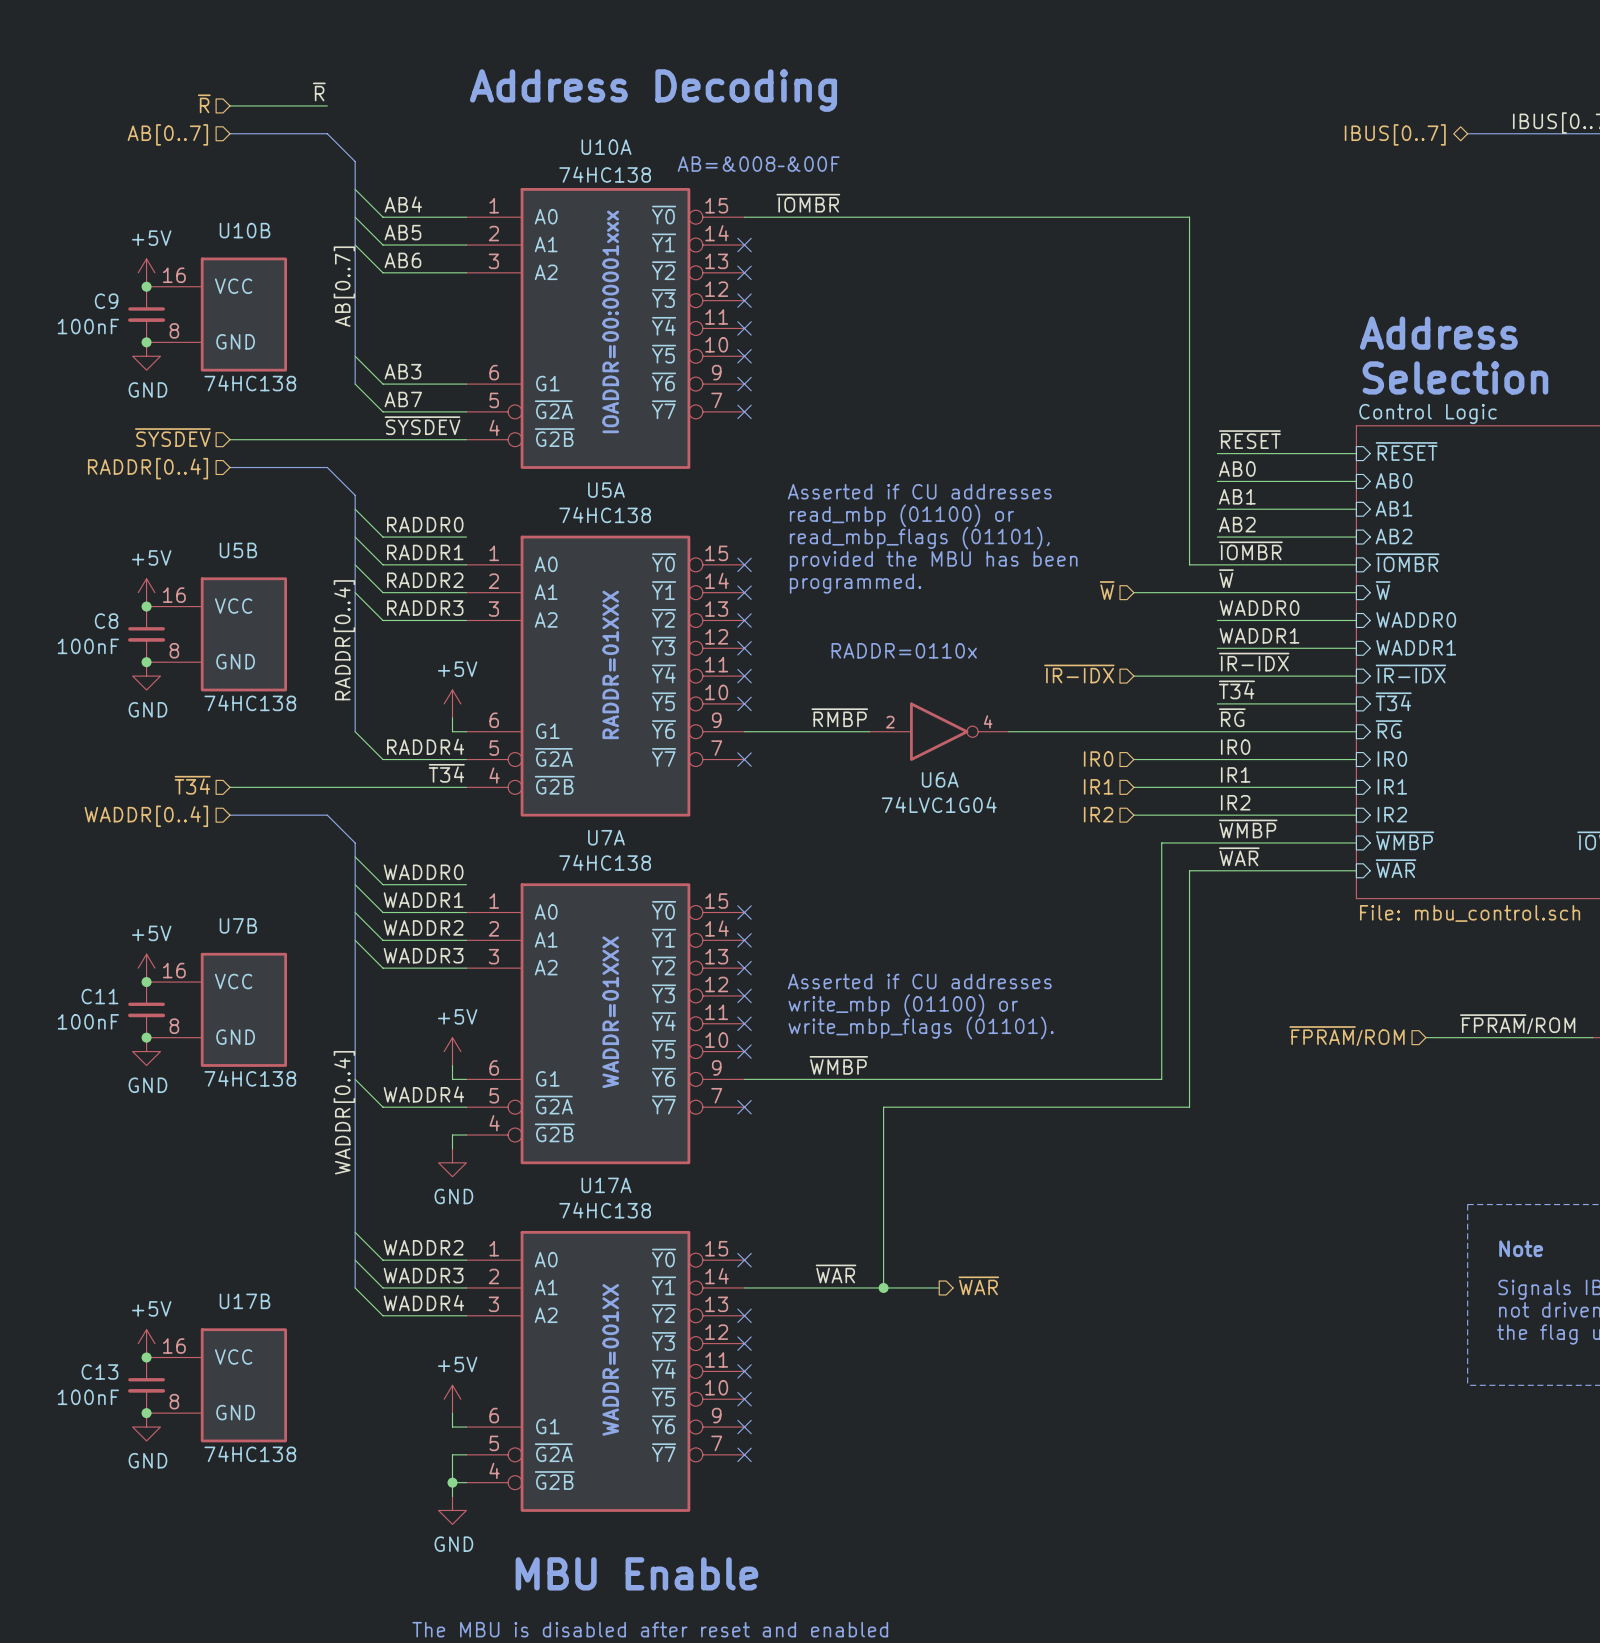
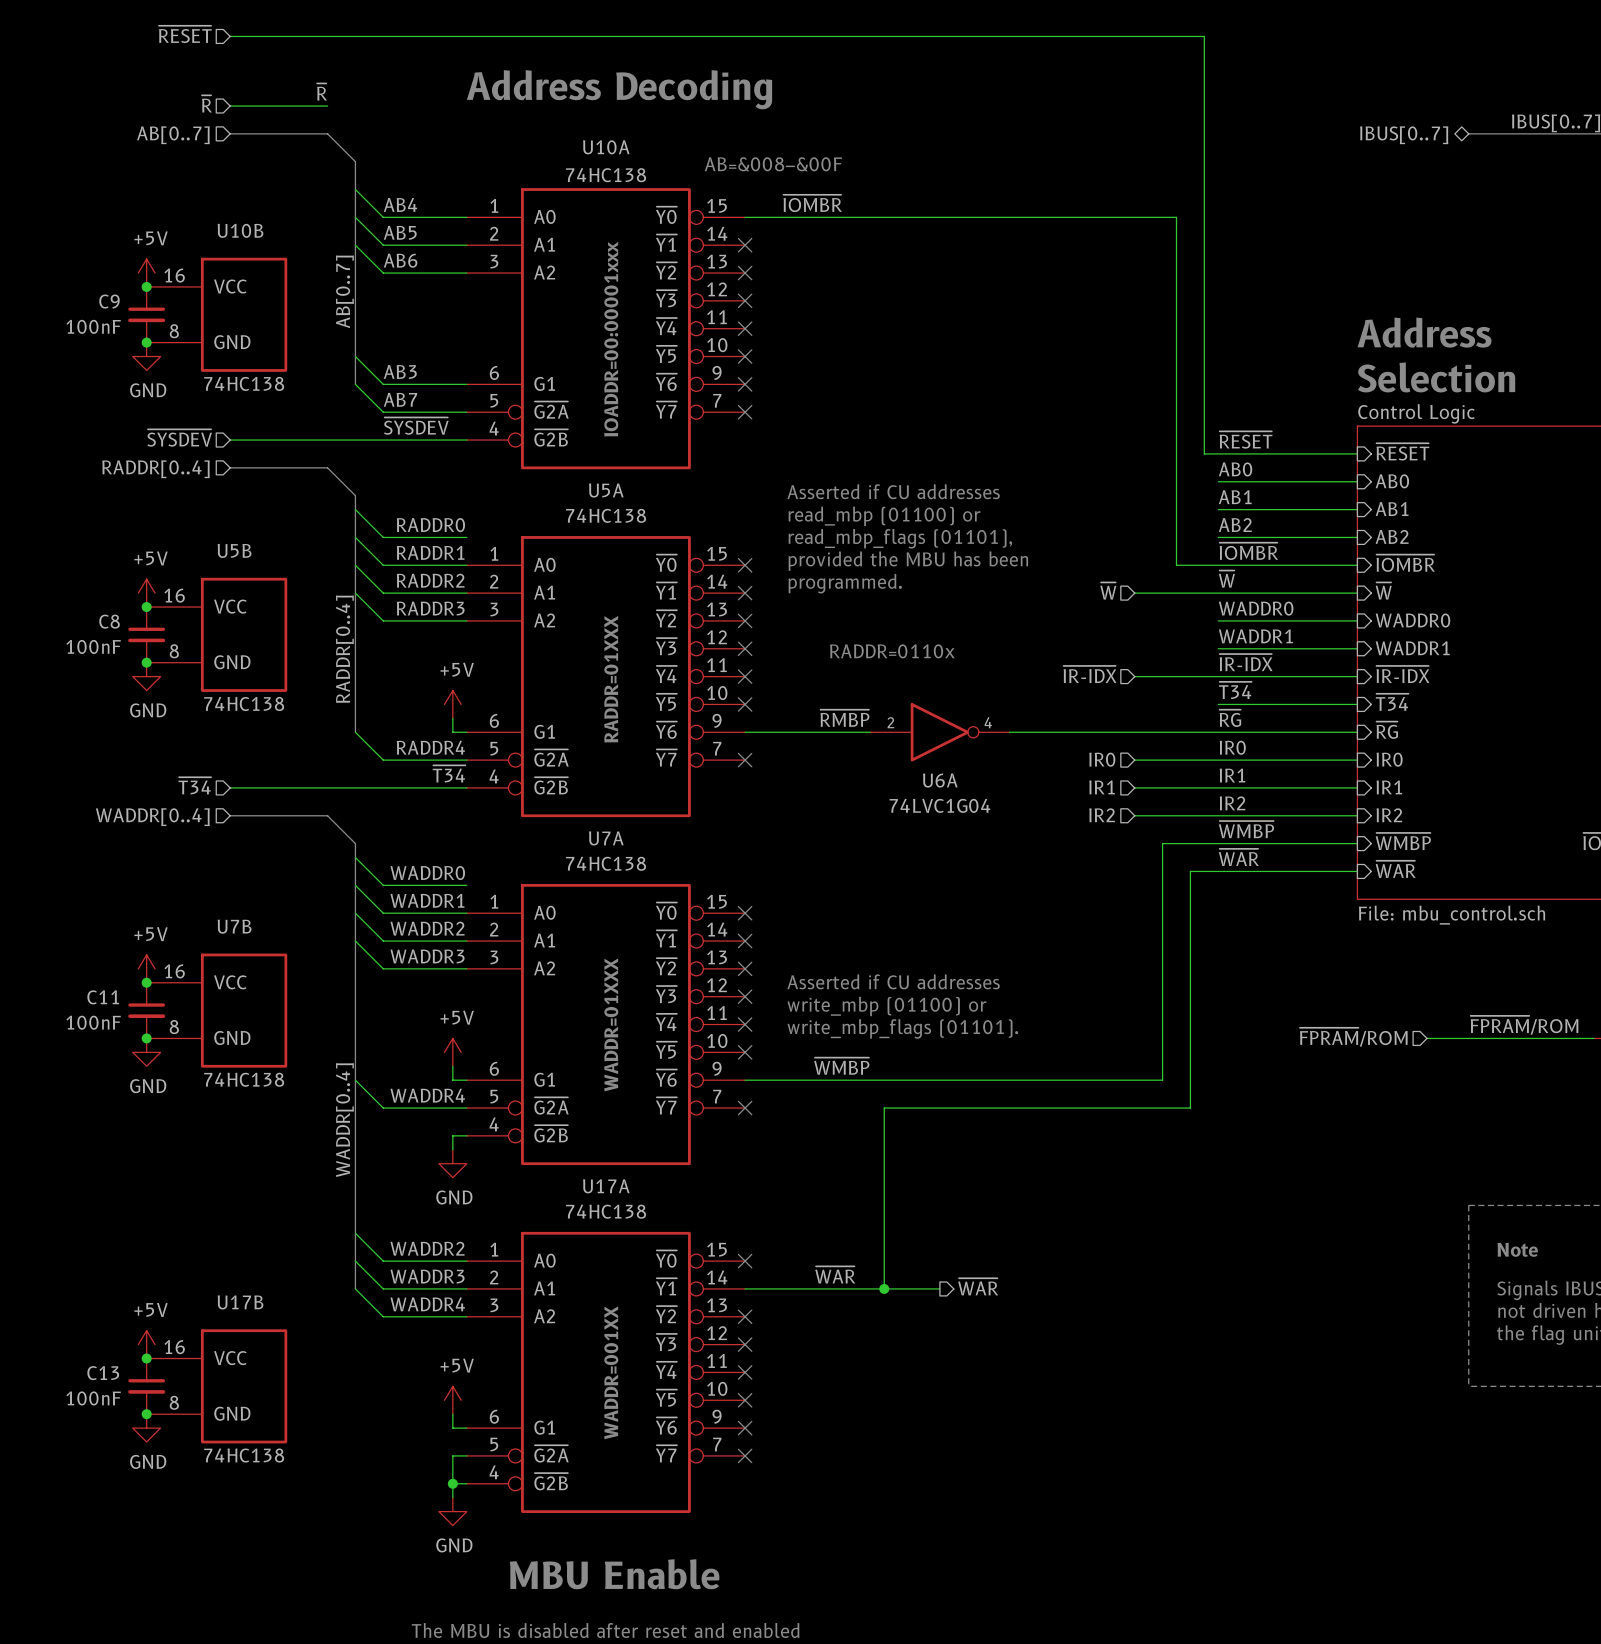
hierarchical label: none -> ~{RESET} (185, 34)
wire: none -> (230, 36) (1204, 36) (1204, 453) (1218, 453)
wire: (1175, 217) (1189, 217) (1189, 564) -> (1176, 217) (1176, 565) (1190, 565)

